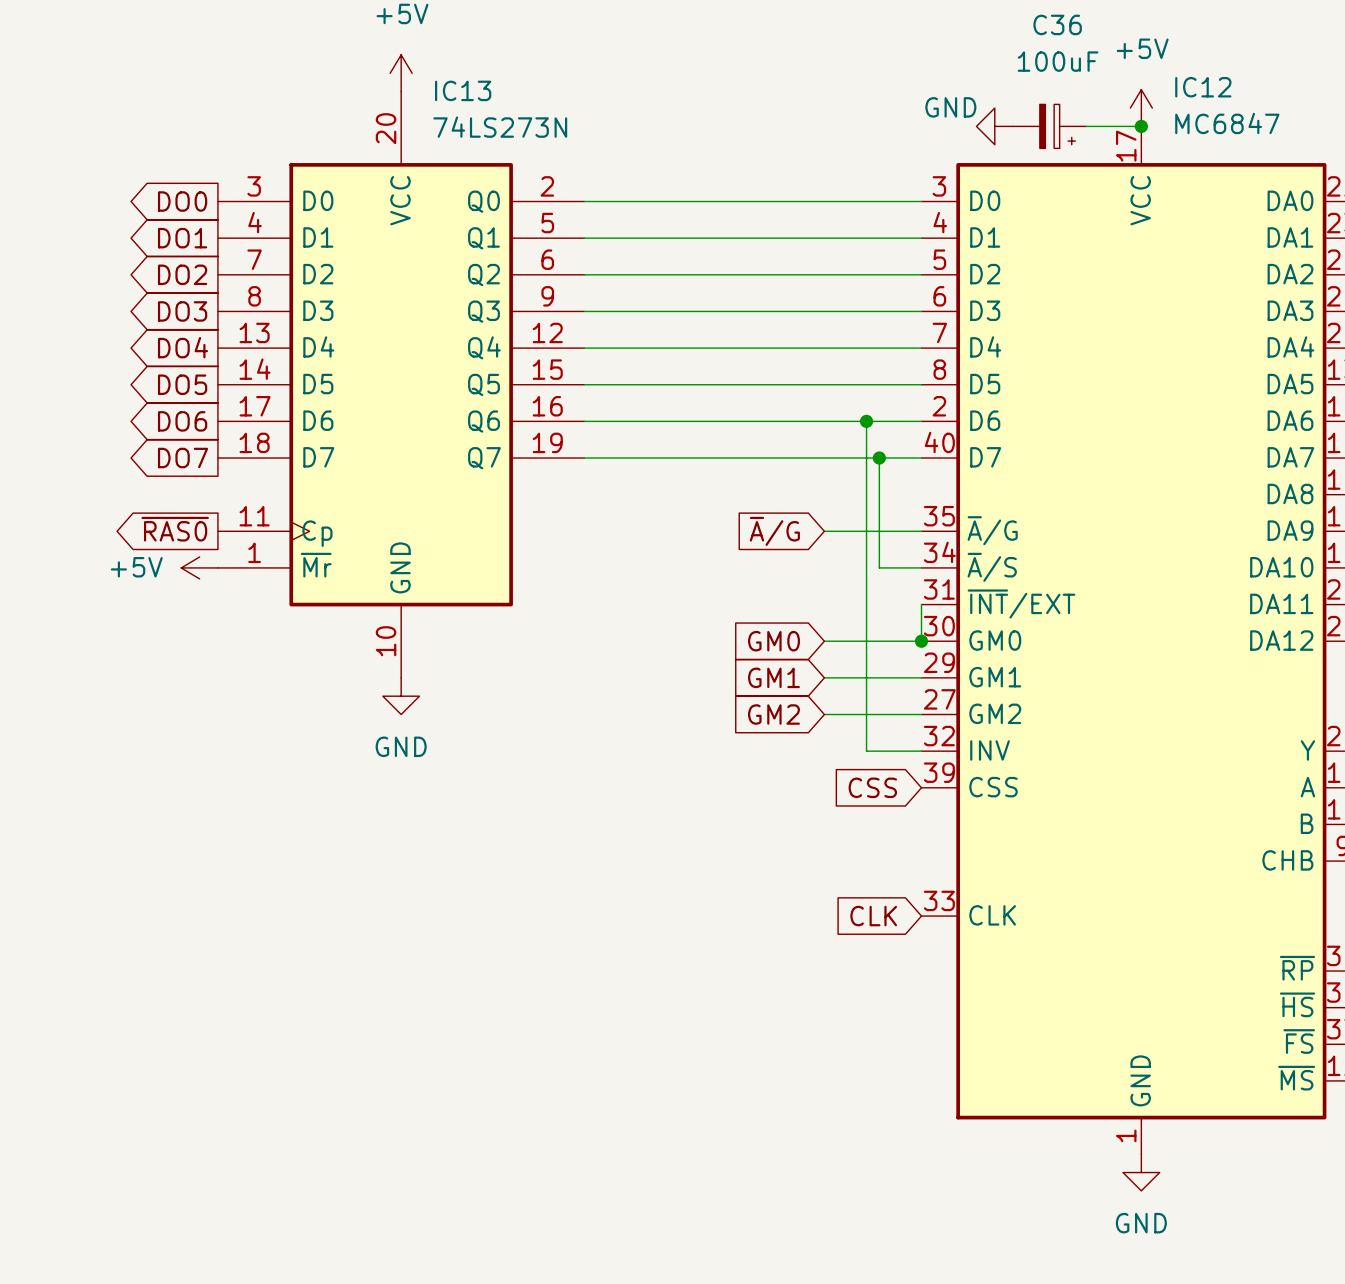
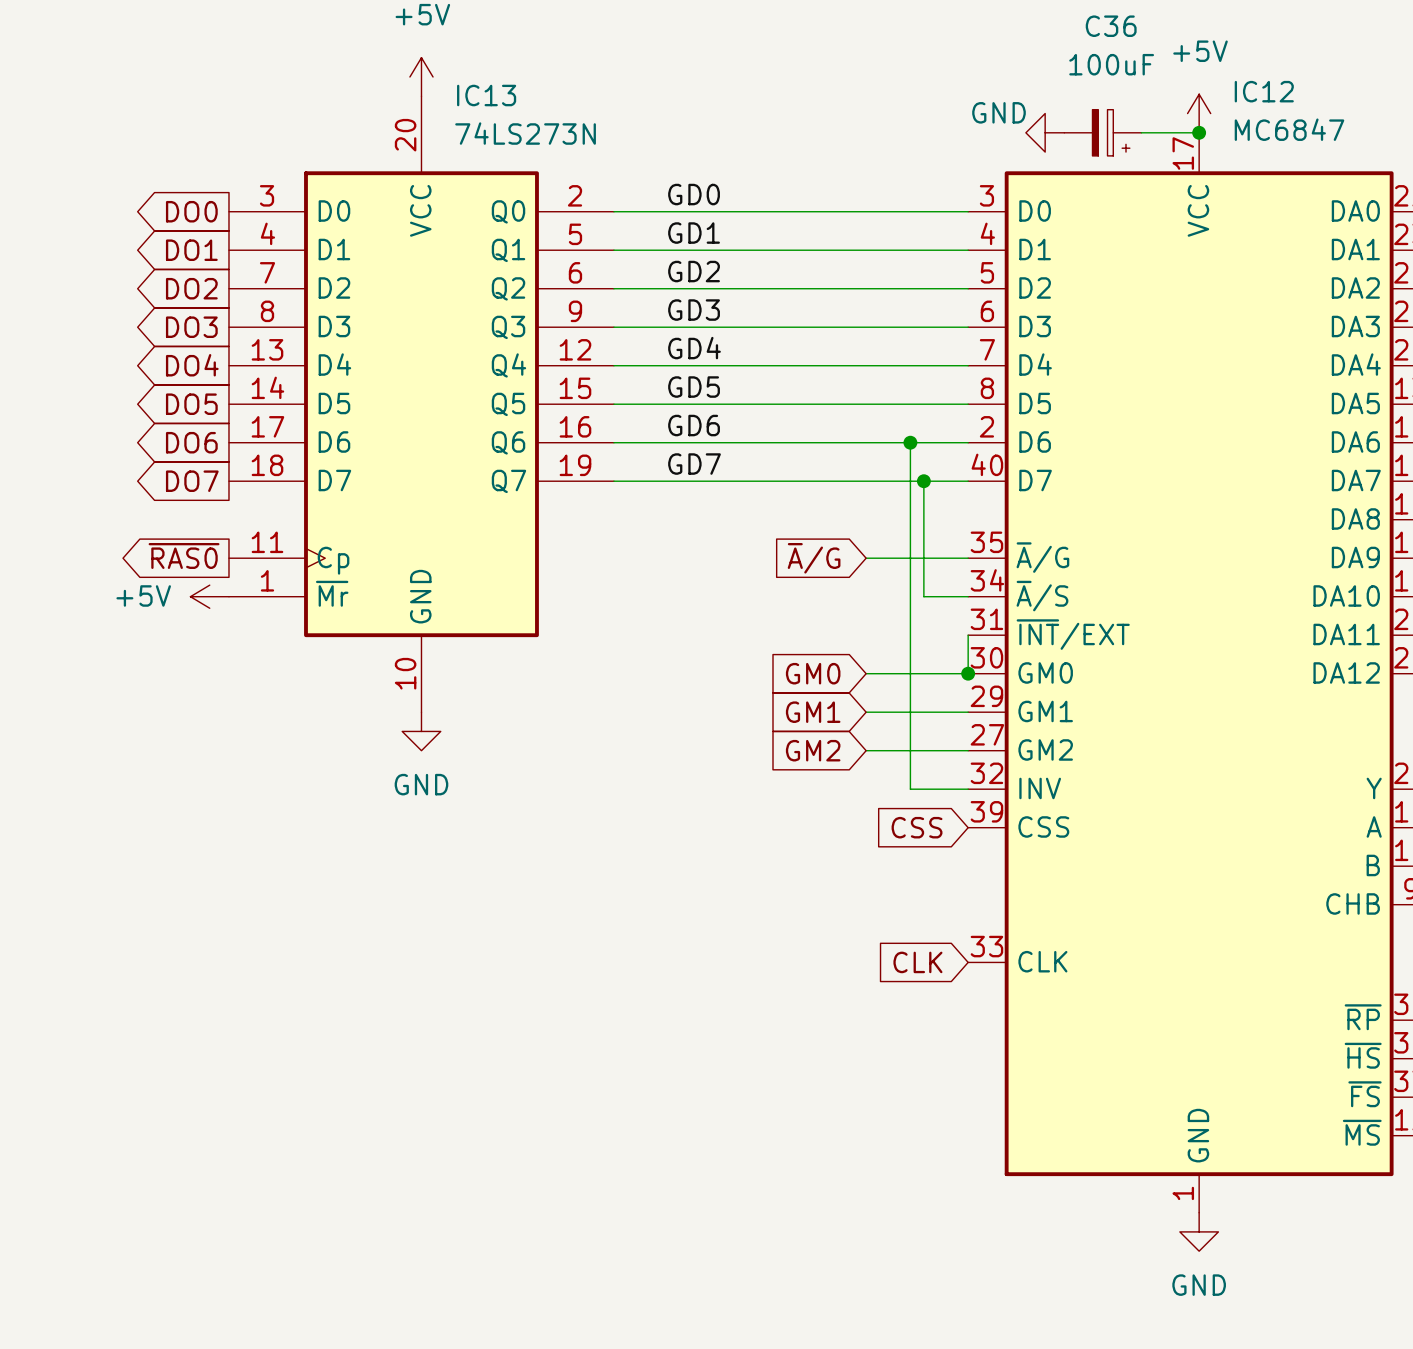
label: none -> GD0 (694, 194)
label: none -> GD1 (694, 233)
label: none -> GD2 (694, 271)
label: none -> GD3 (694, 310)
label: none -> GD4 (694, 348)
label: none -> GD5 (694, 387)
label: none -> GD6 (694, 425)
label: none -> GD7 (694, 464)

